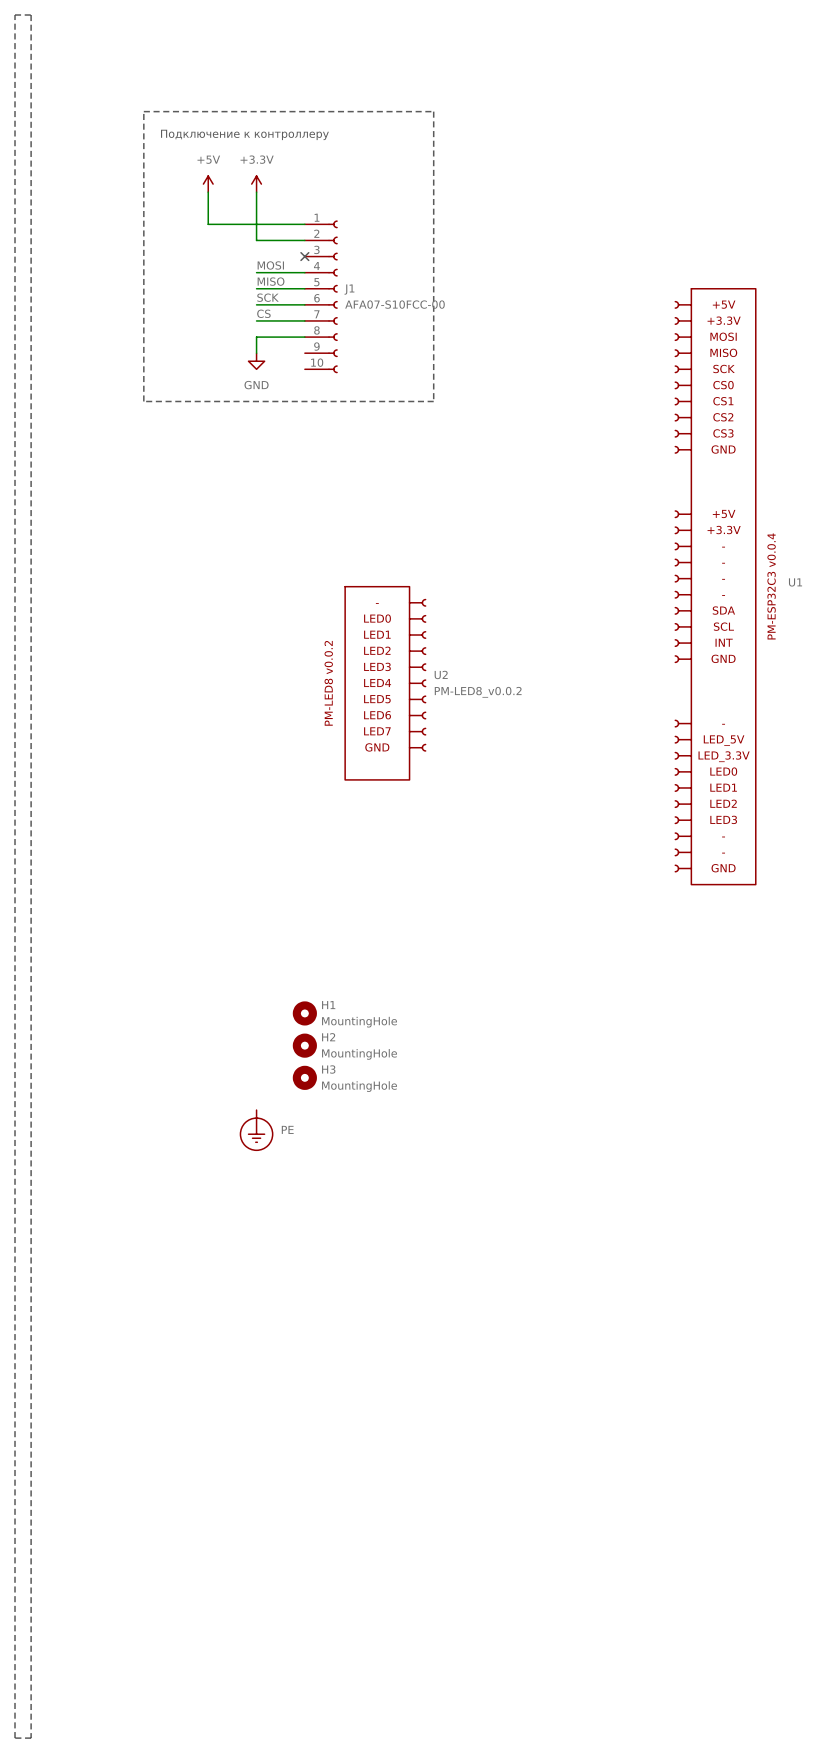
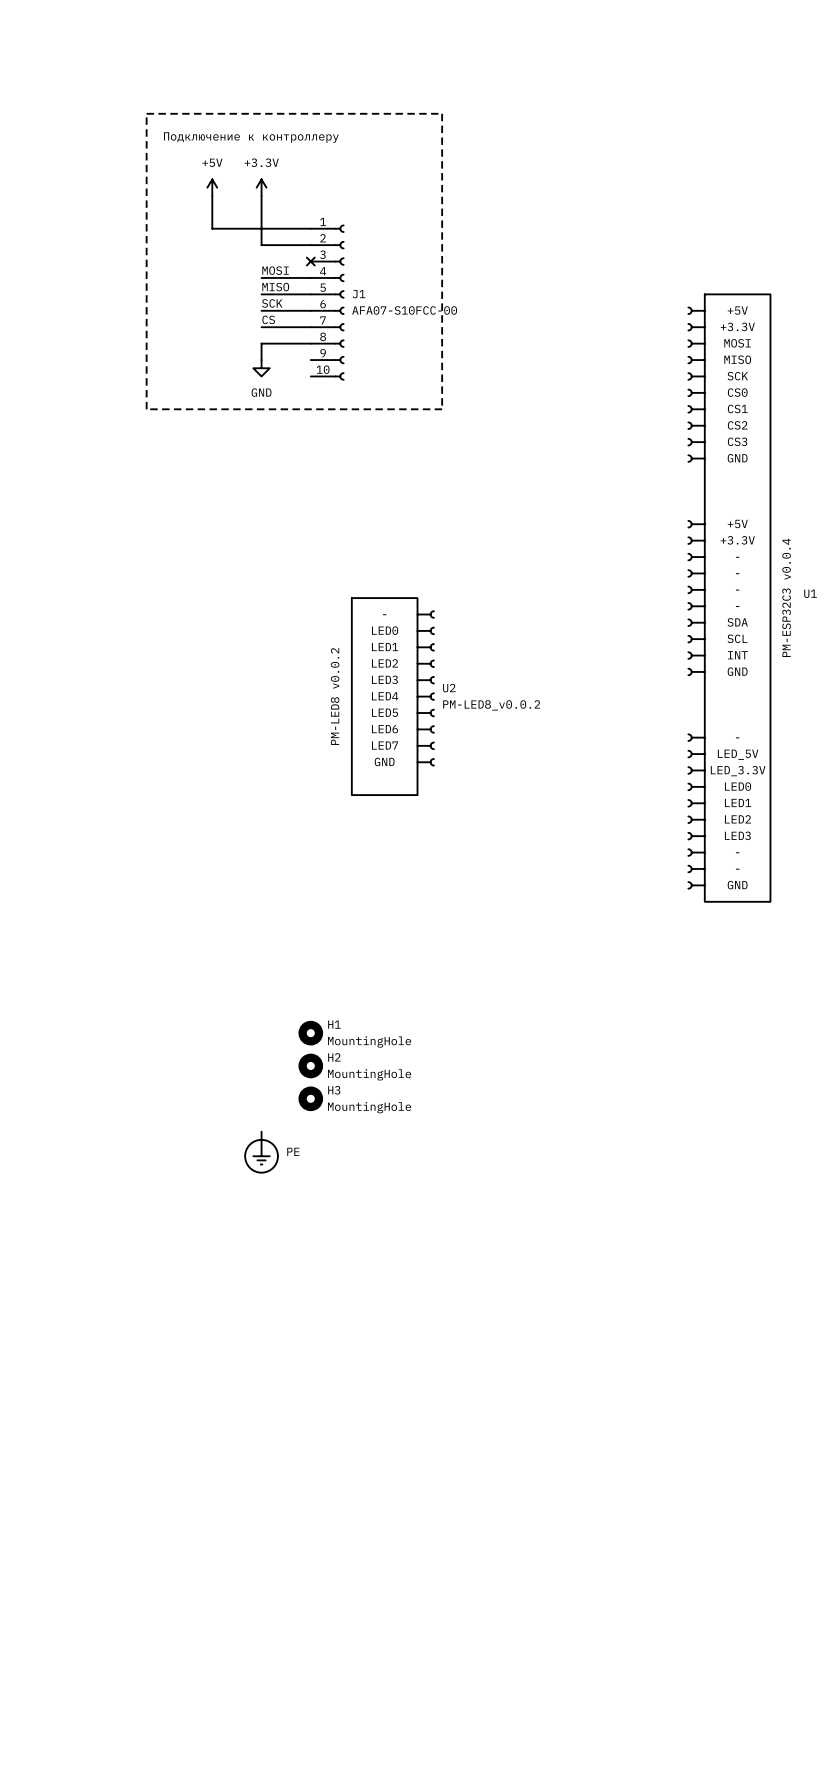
line: (15, 15) (31, 15) (31, 1738) (15, 1738) (15, 15) -> none

